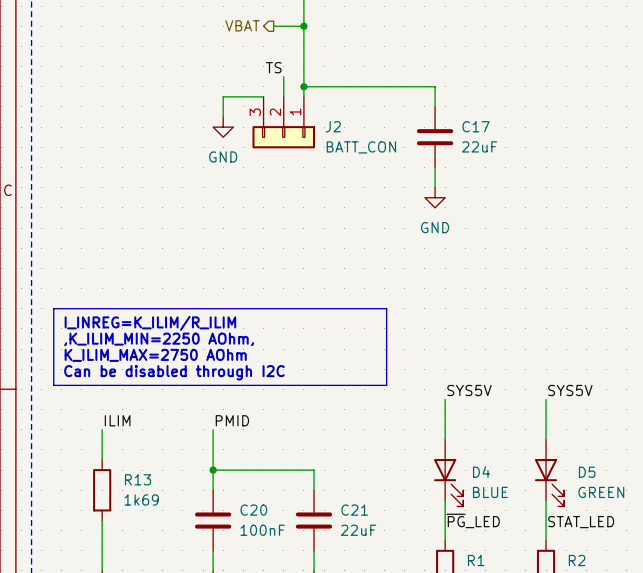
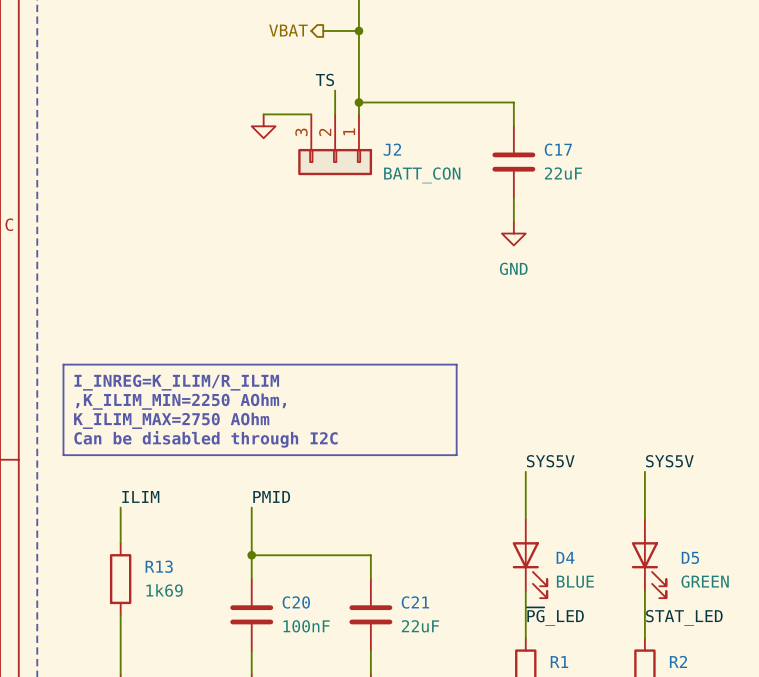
power symbol: none -> (263, 126)
power symbol: GND (223, 127) -> none

